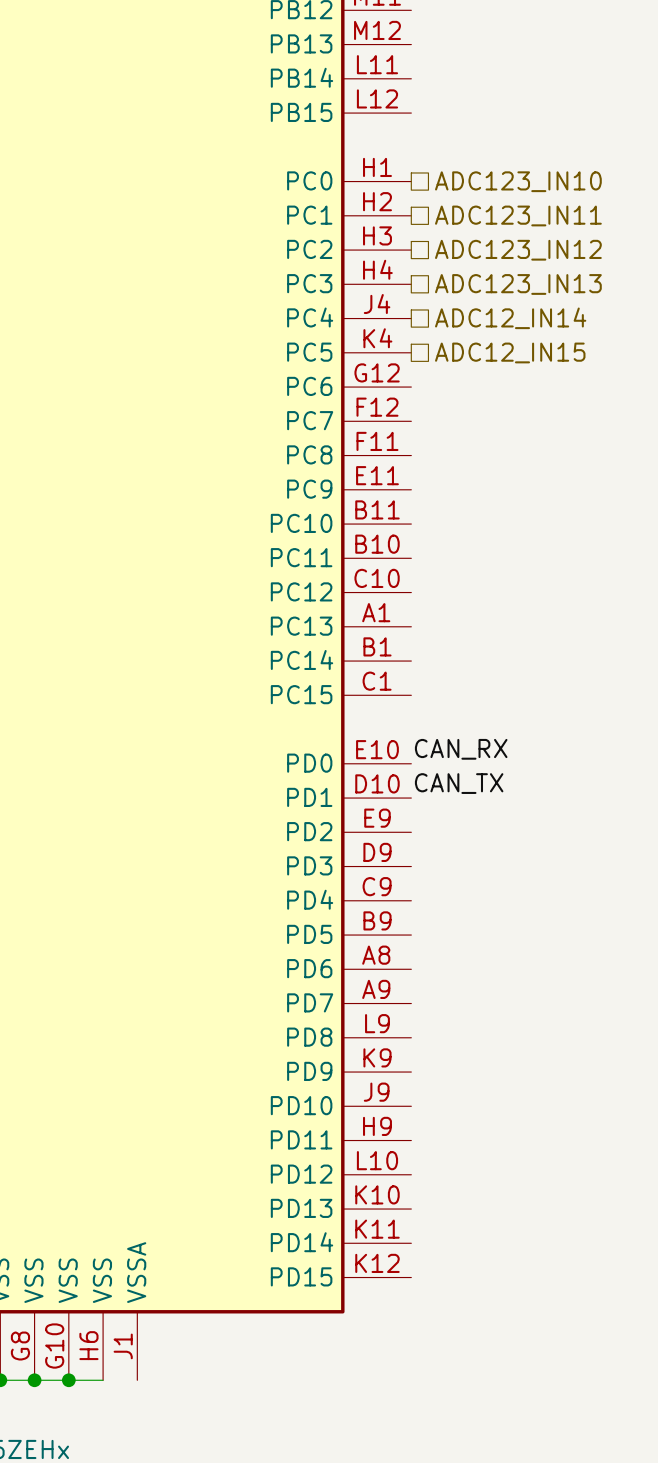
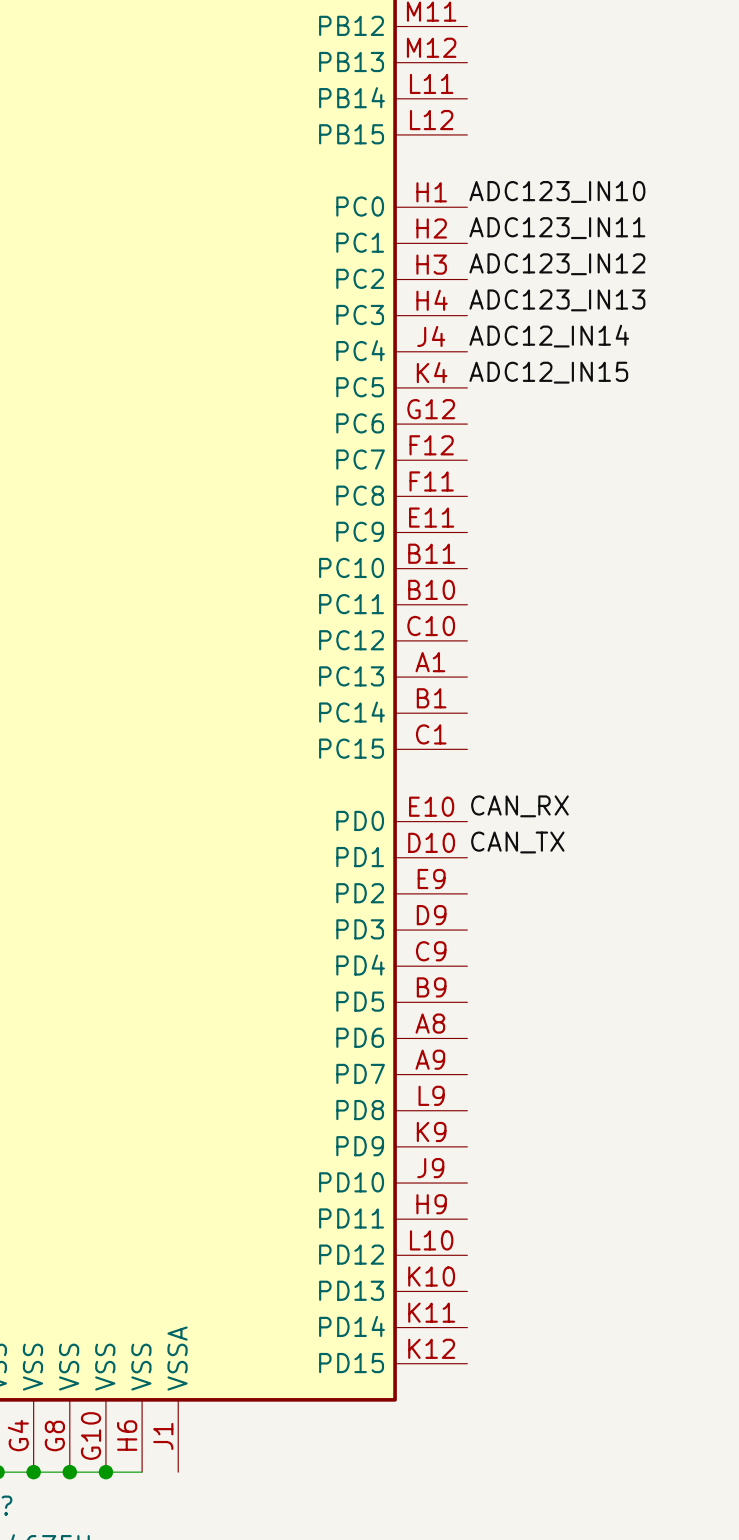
label: none -> ADC123_IN10 (557, 191)
hierarchical label: ADC123_IN10 (518, 181) -> none
label: none -> ADC123_IN11 (557, 228)
hierarchical label: ADC123_IN11 (518, 215) -> none
label: none -> ADC123_IN12 (557, 264)
hierarchical label: ADC123_IN12 (518, 250) -> none
label: none -> ADC123_IN13 (557, 300)
hierarchical label: ADC123_IN13 (518, 284) -> none
label: none -> ADC12_IN14 (549, 336)
hierarchical label: ADC12_IN14 (510, 318) -> none
label: none -> ADC12_IN15 (548, 372)
hierarchical label: ADC12_IN15 (510, 352) -> none

